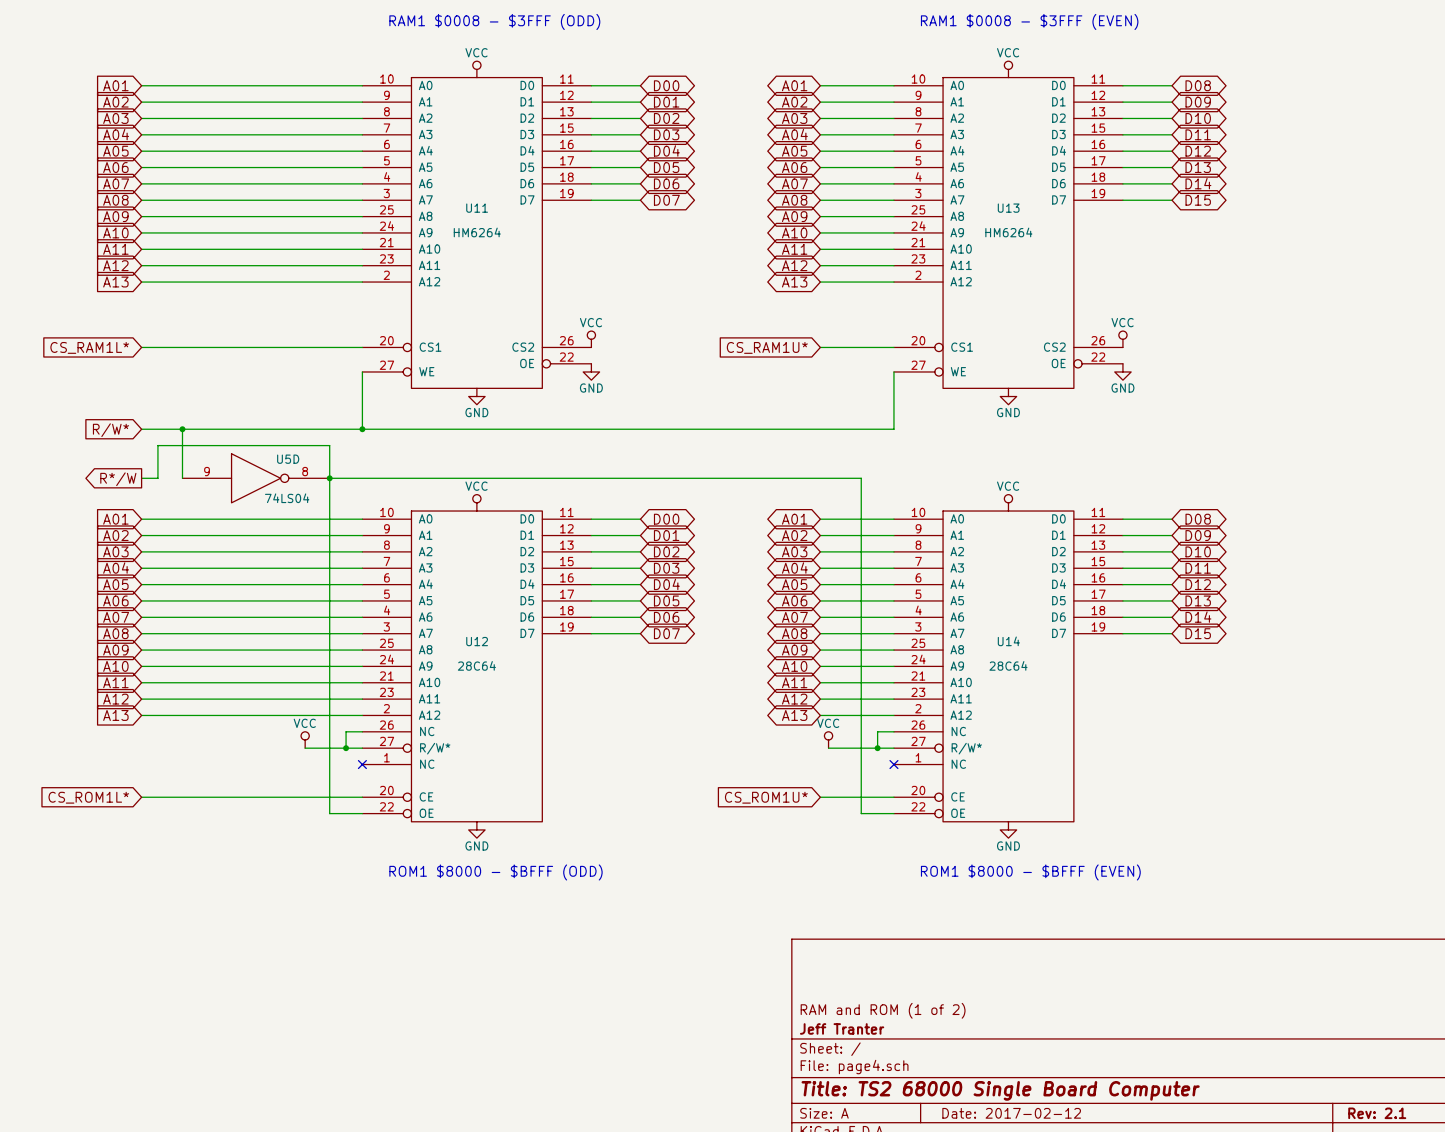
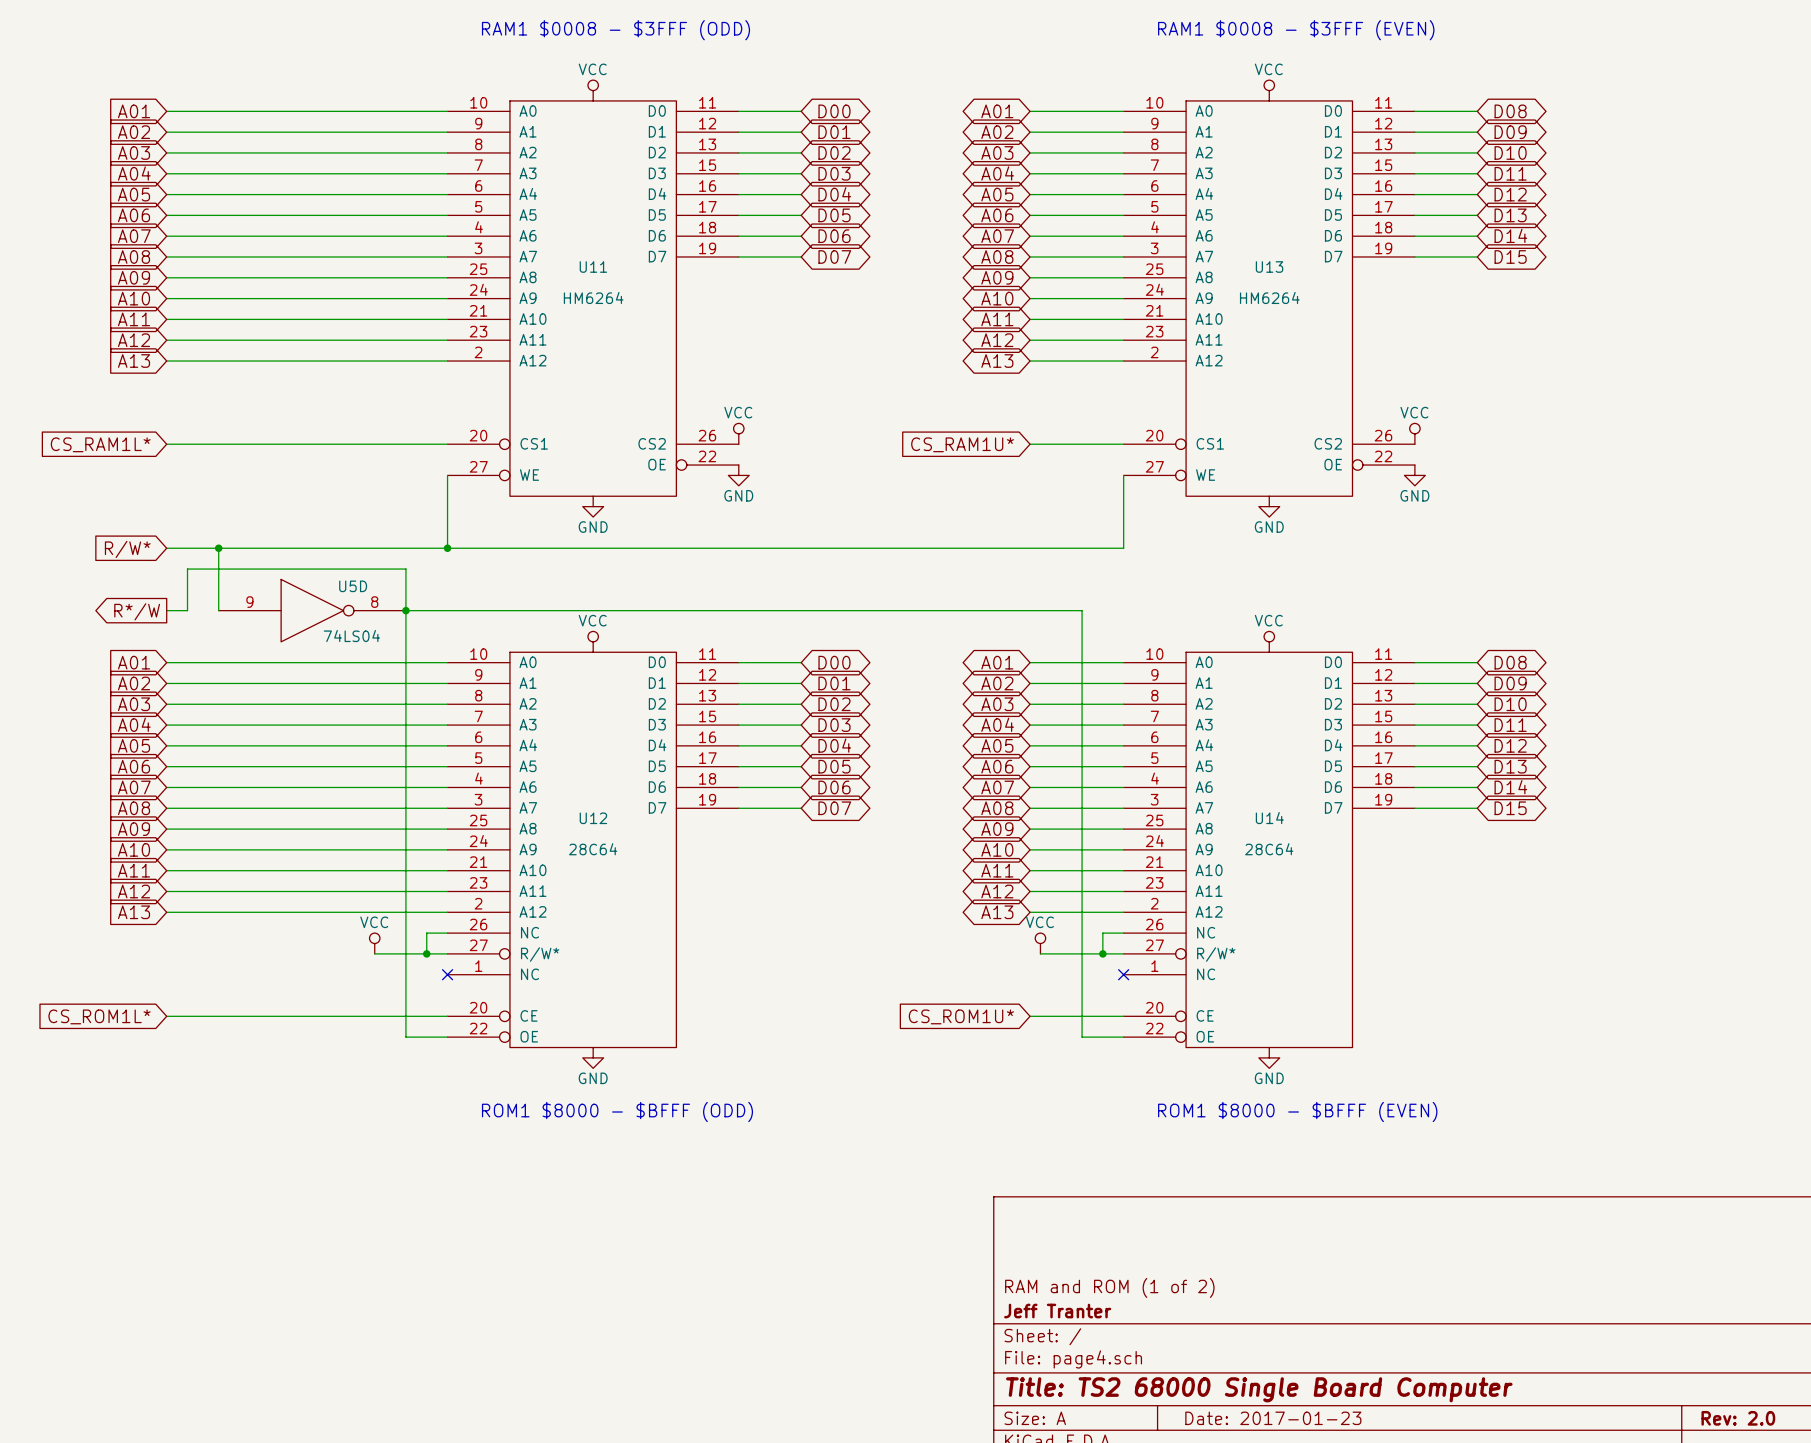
title block: Date: 2017-02-12 (1011, 1113) -> Date: 2017-01-23 (1273, 1418)
title block: Rev: 2.1 (1377, 1113) -> Rev: 2.0 (1738, 1418)

